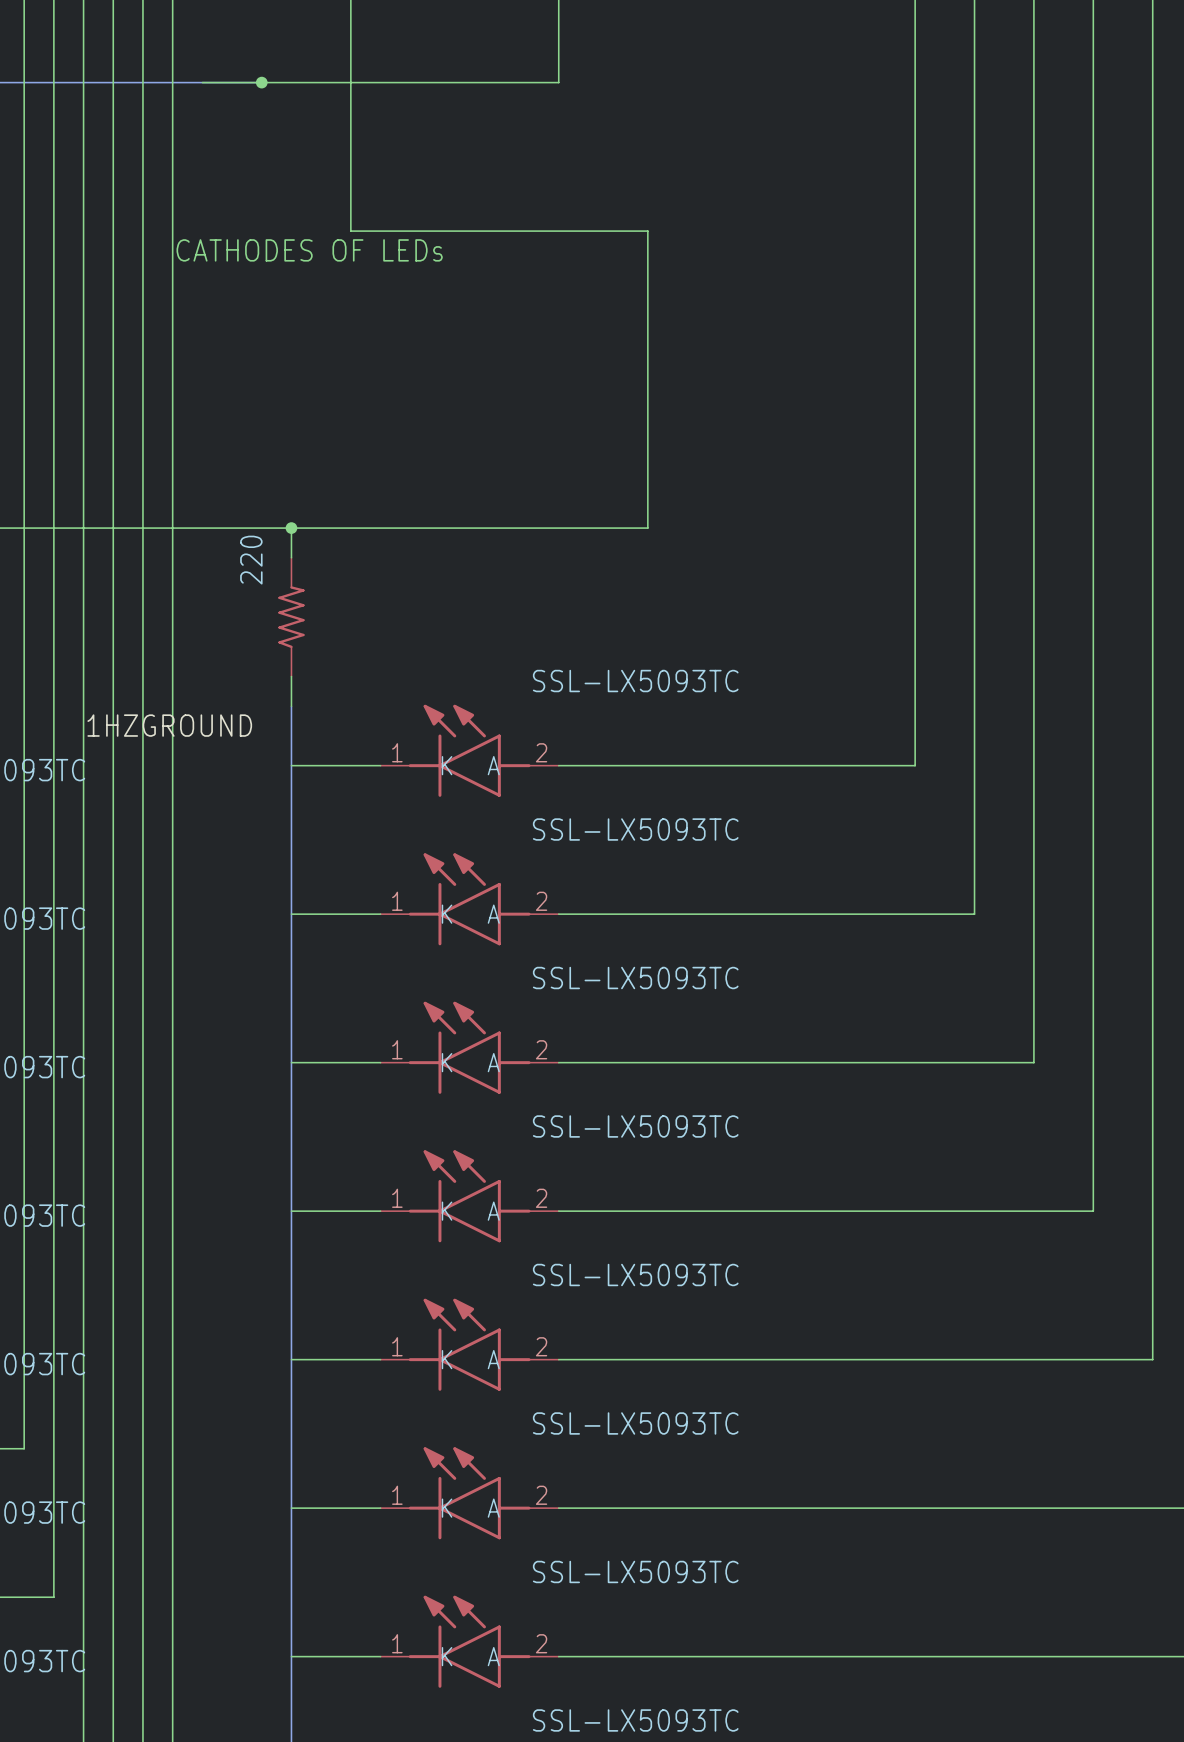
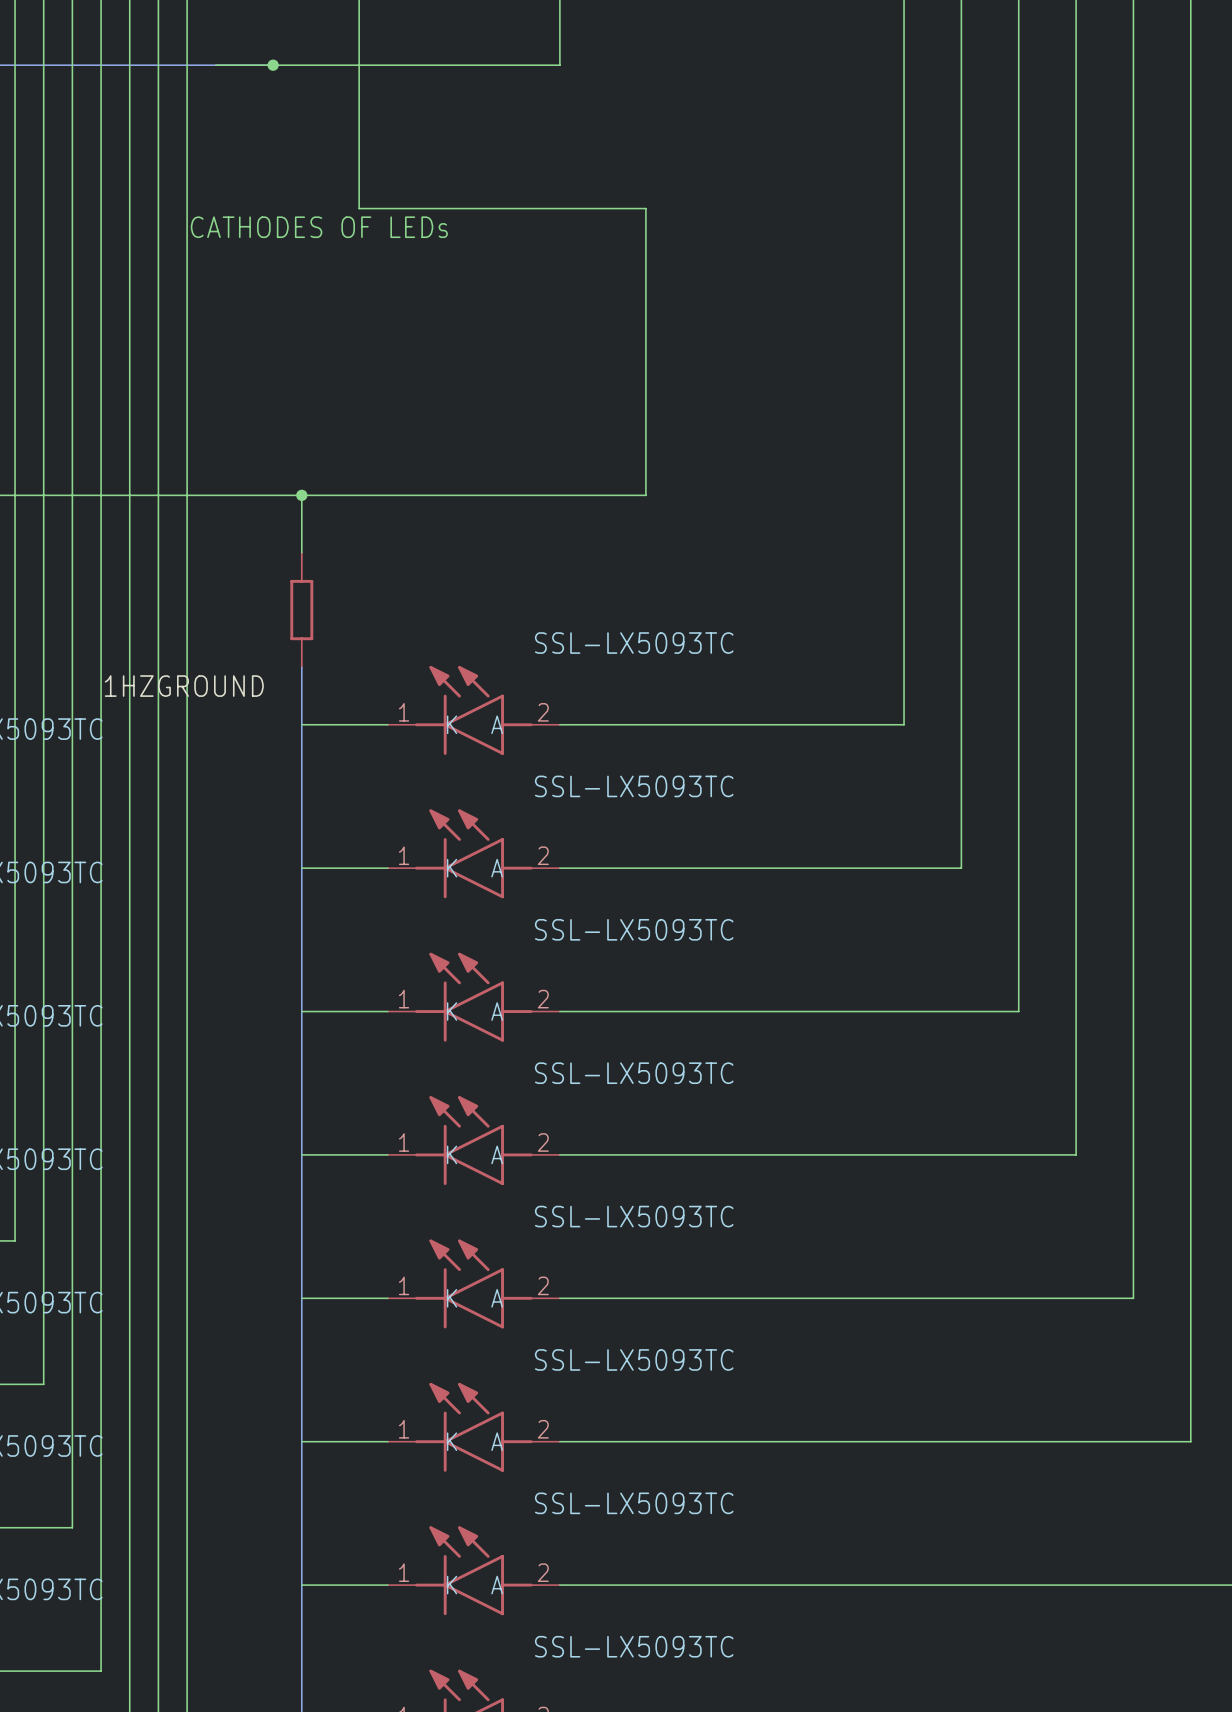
part: (291, 617) -> none
part: none -> (301, 610)

